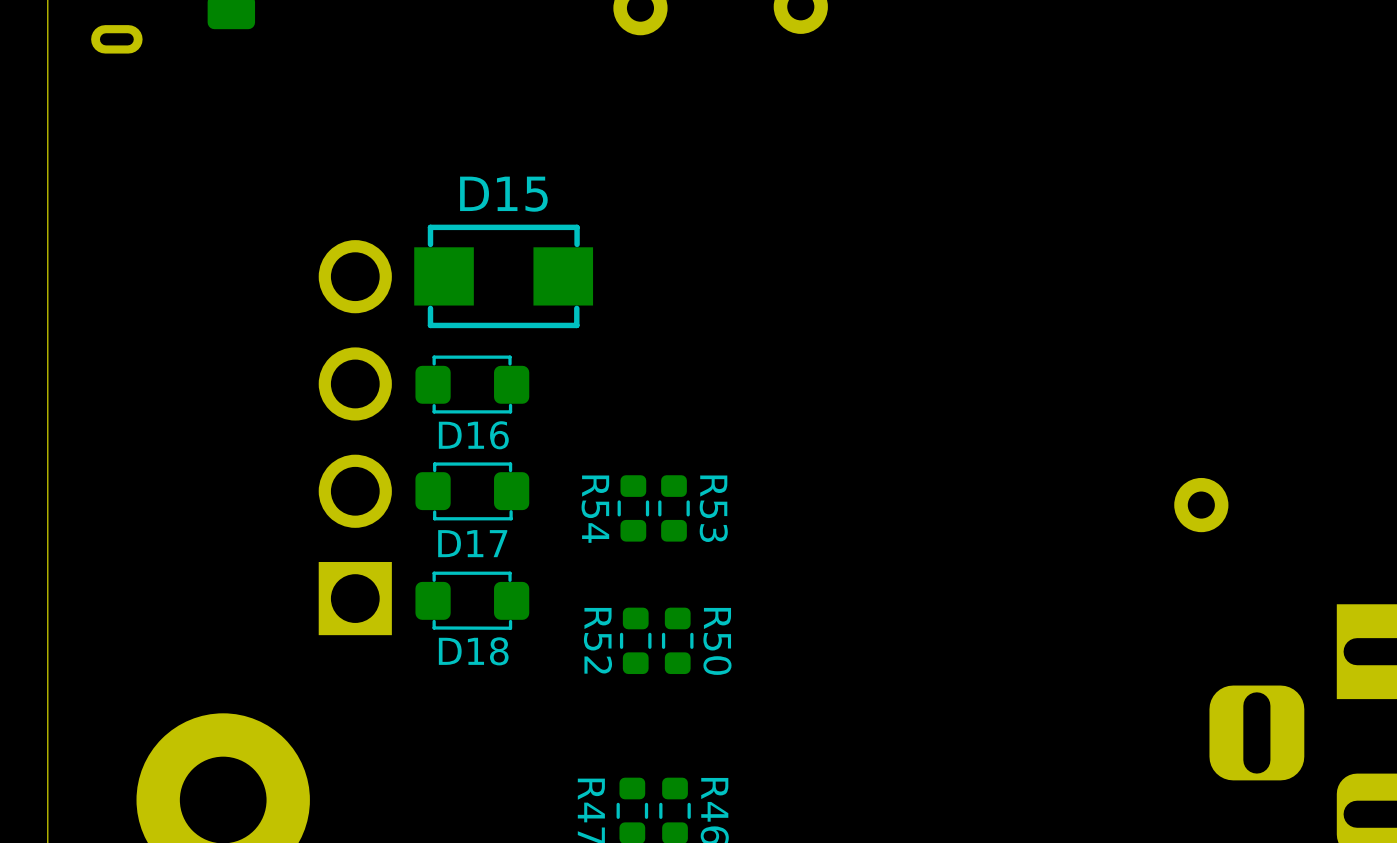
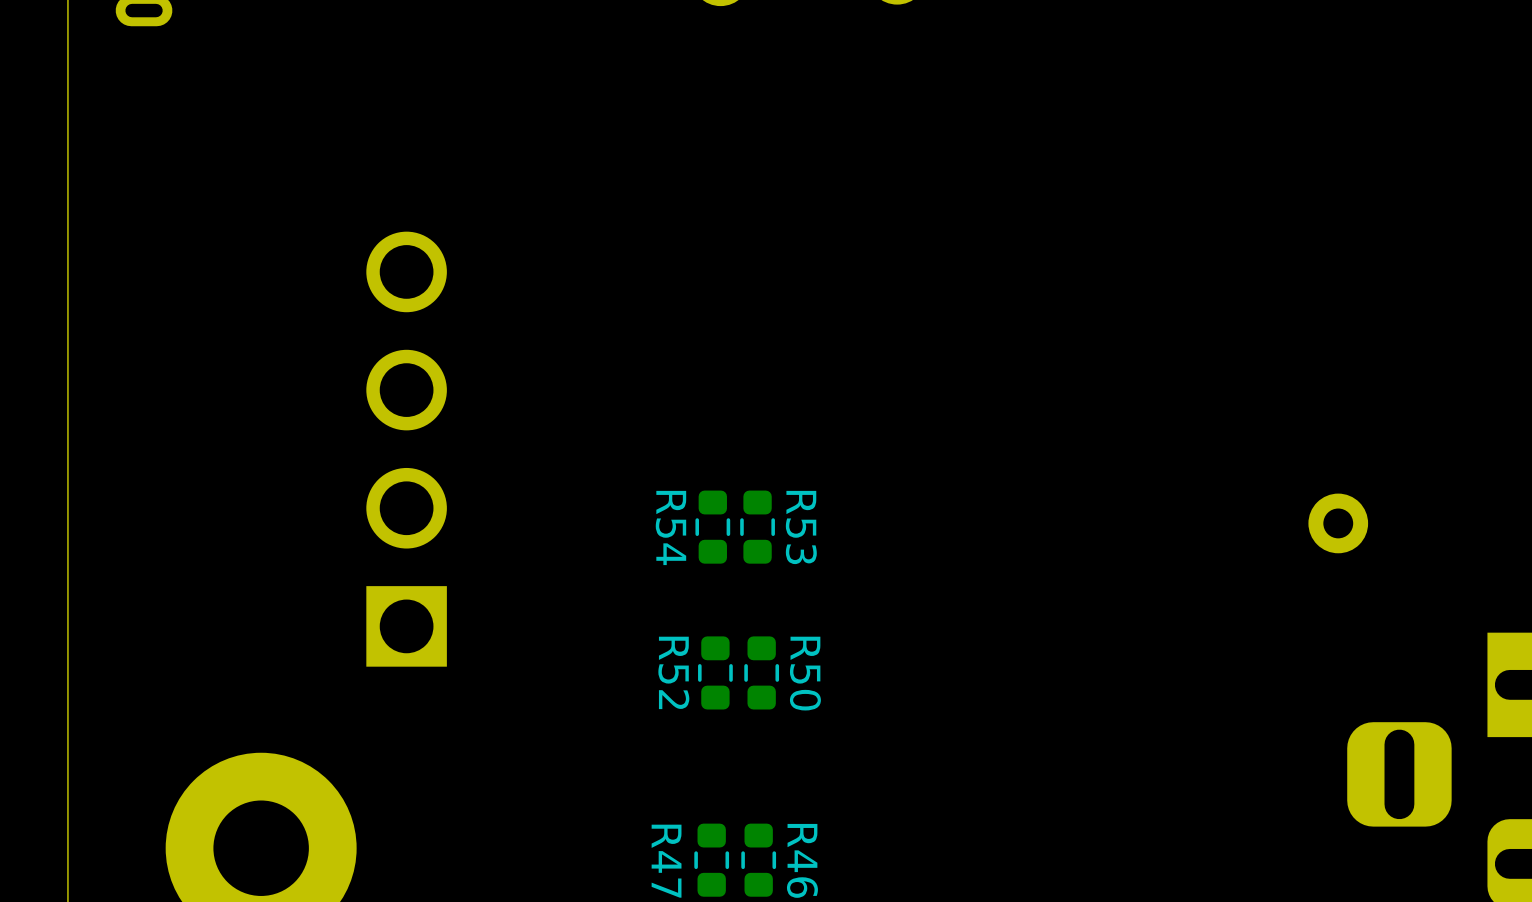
D15: (503, 276) -> none
D16: (472, 384) -> none
D17: (472, 491) -> none
D18: (472, 600) -> none

